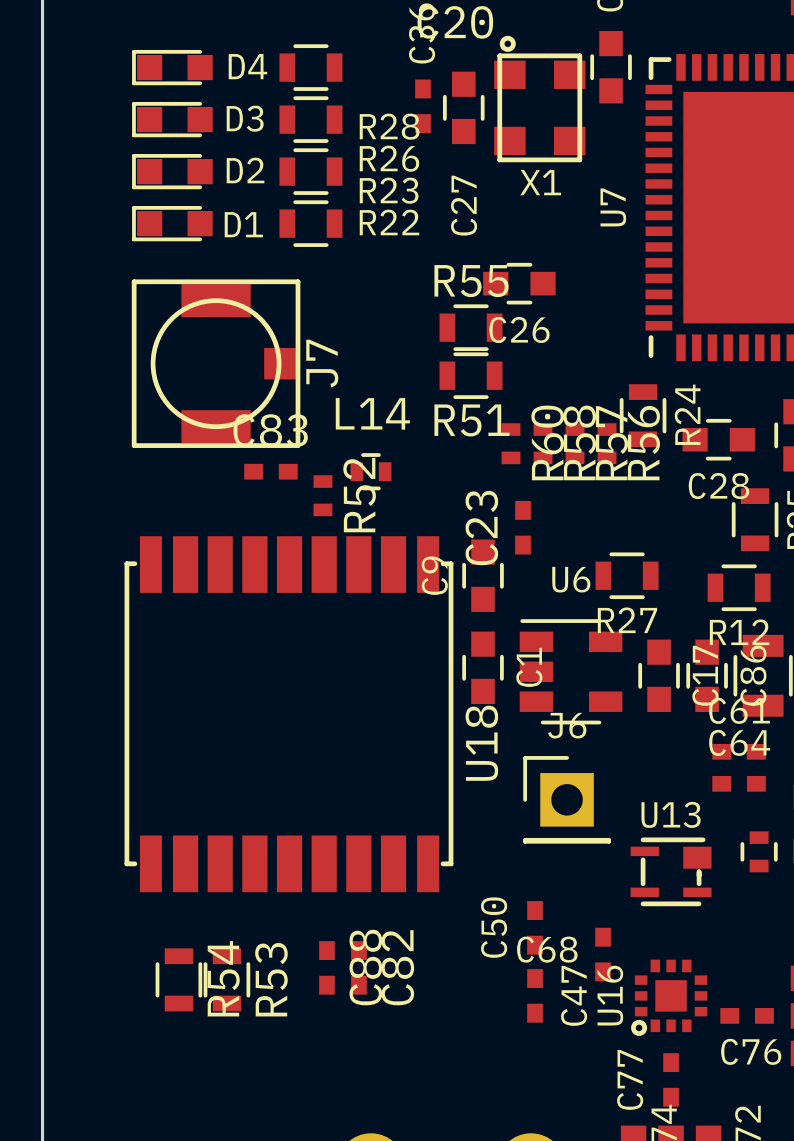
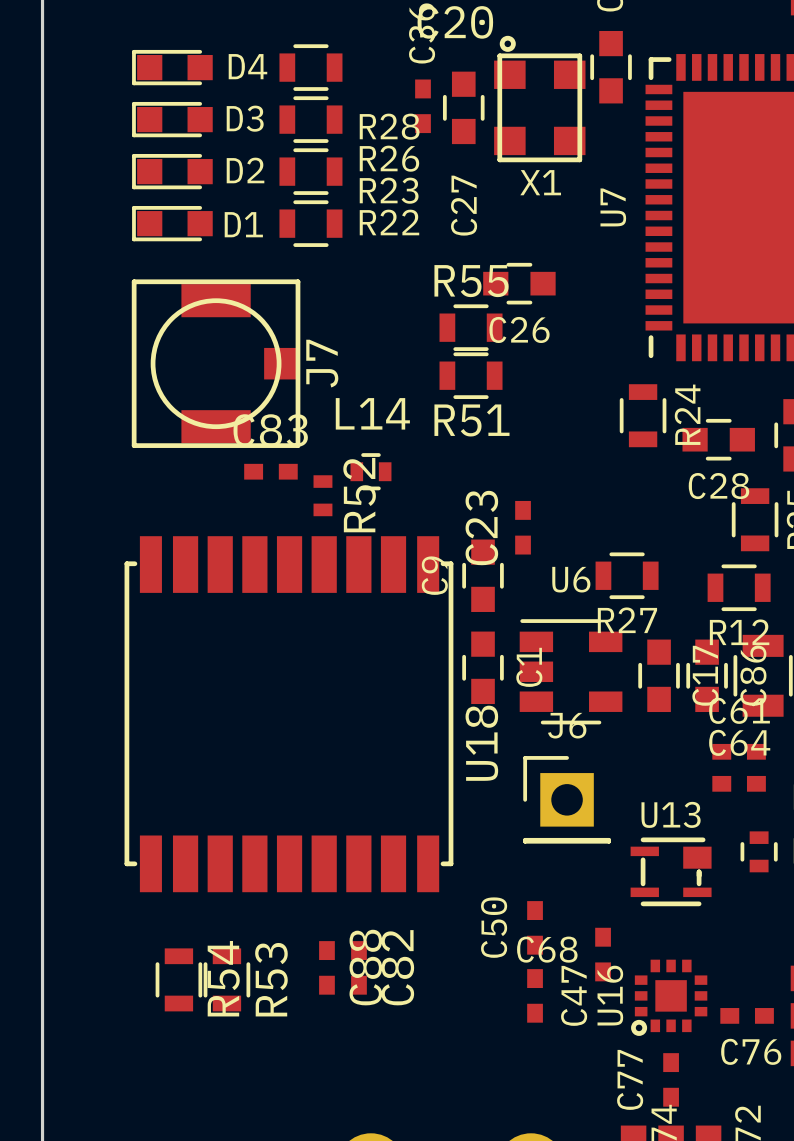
R60: (511, 443) -> none
R58: (543, 443) -> none
R57: (575, 443) -> none
R56: (607, 443) -> none

